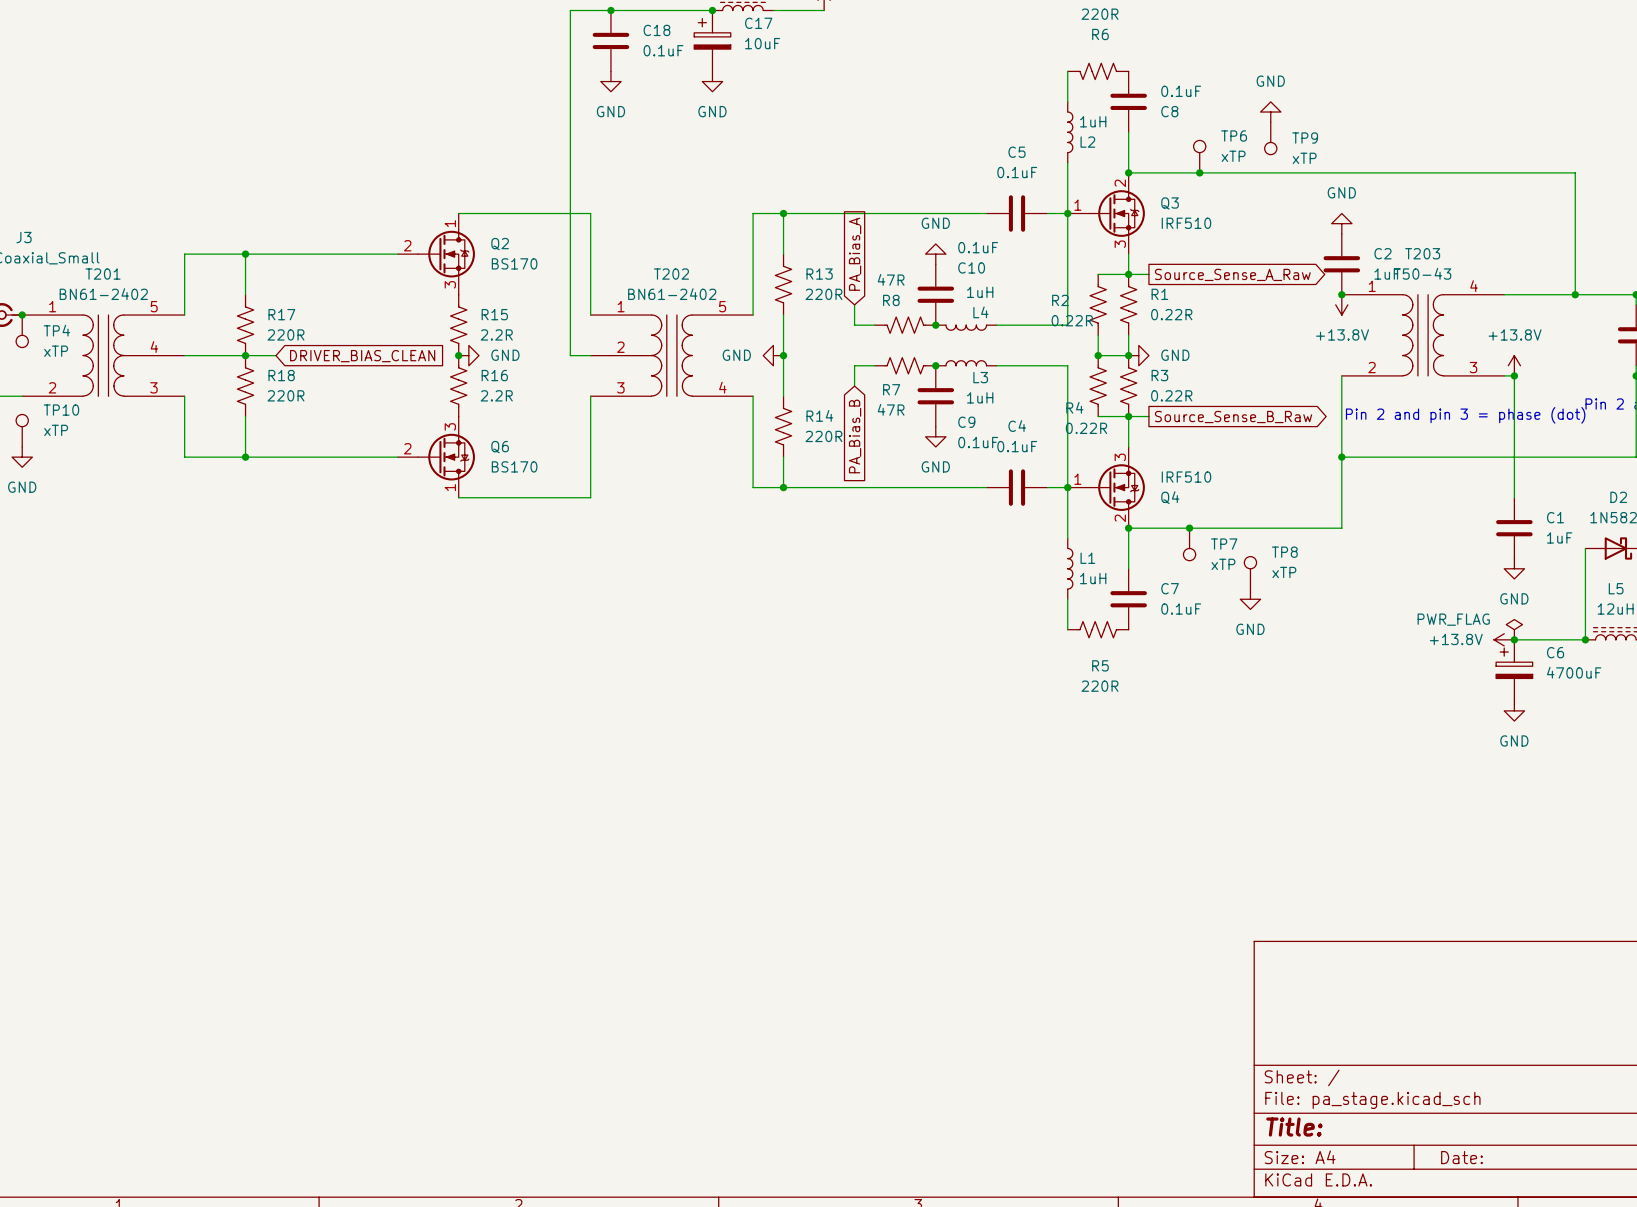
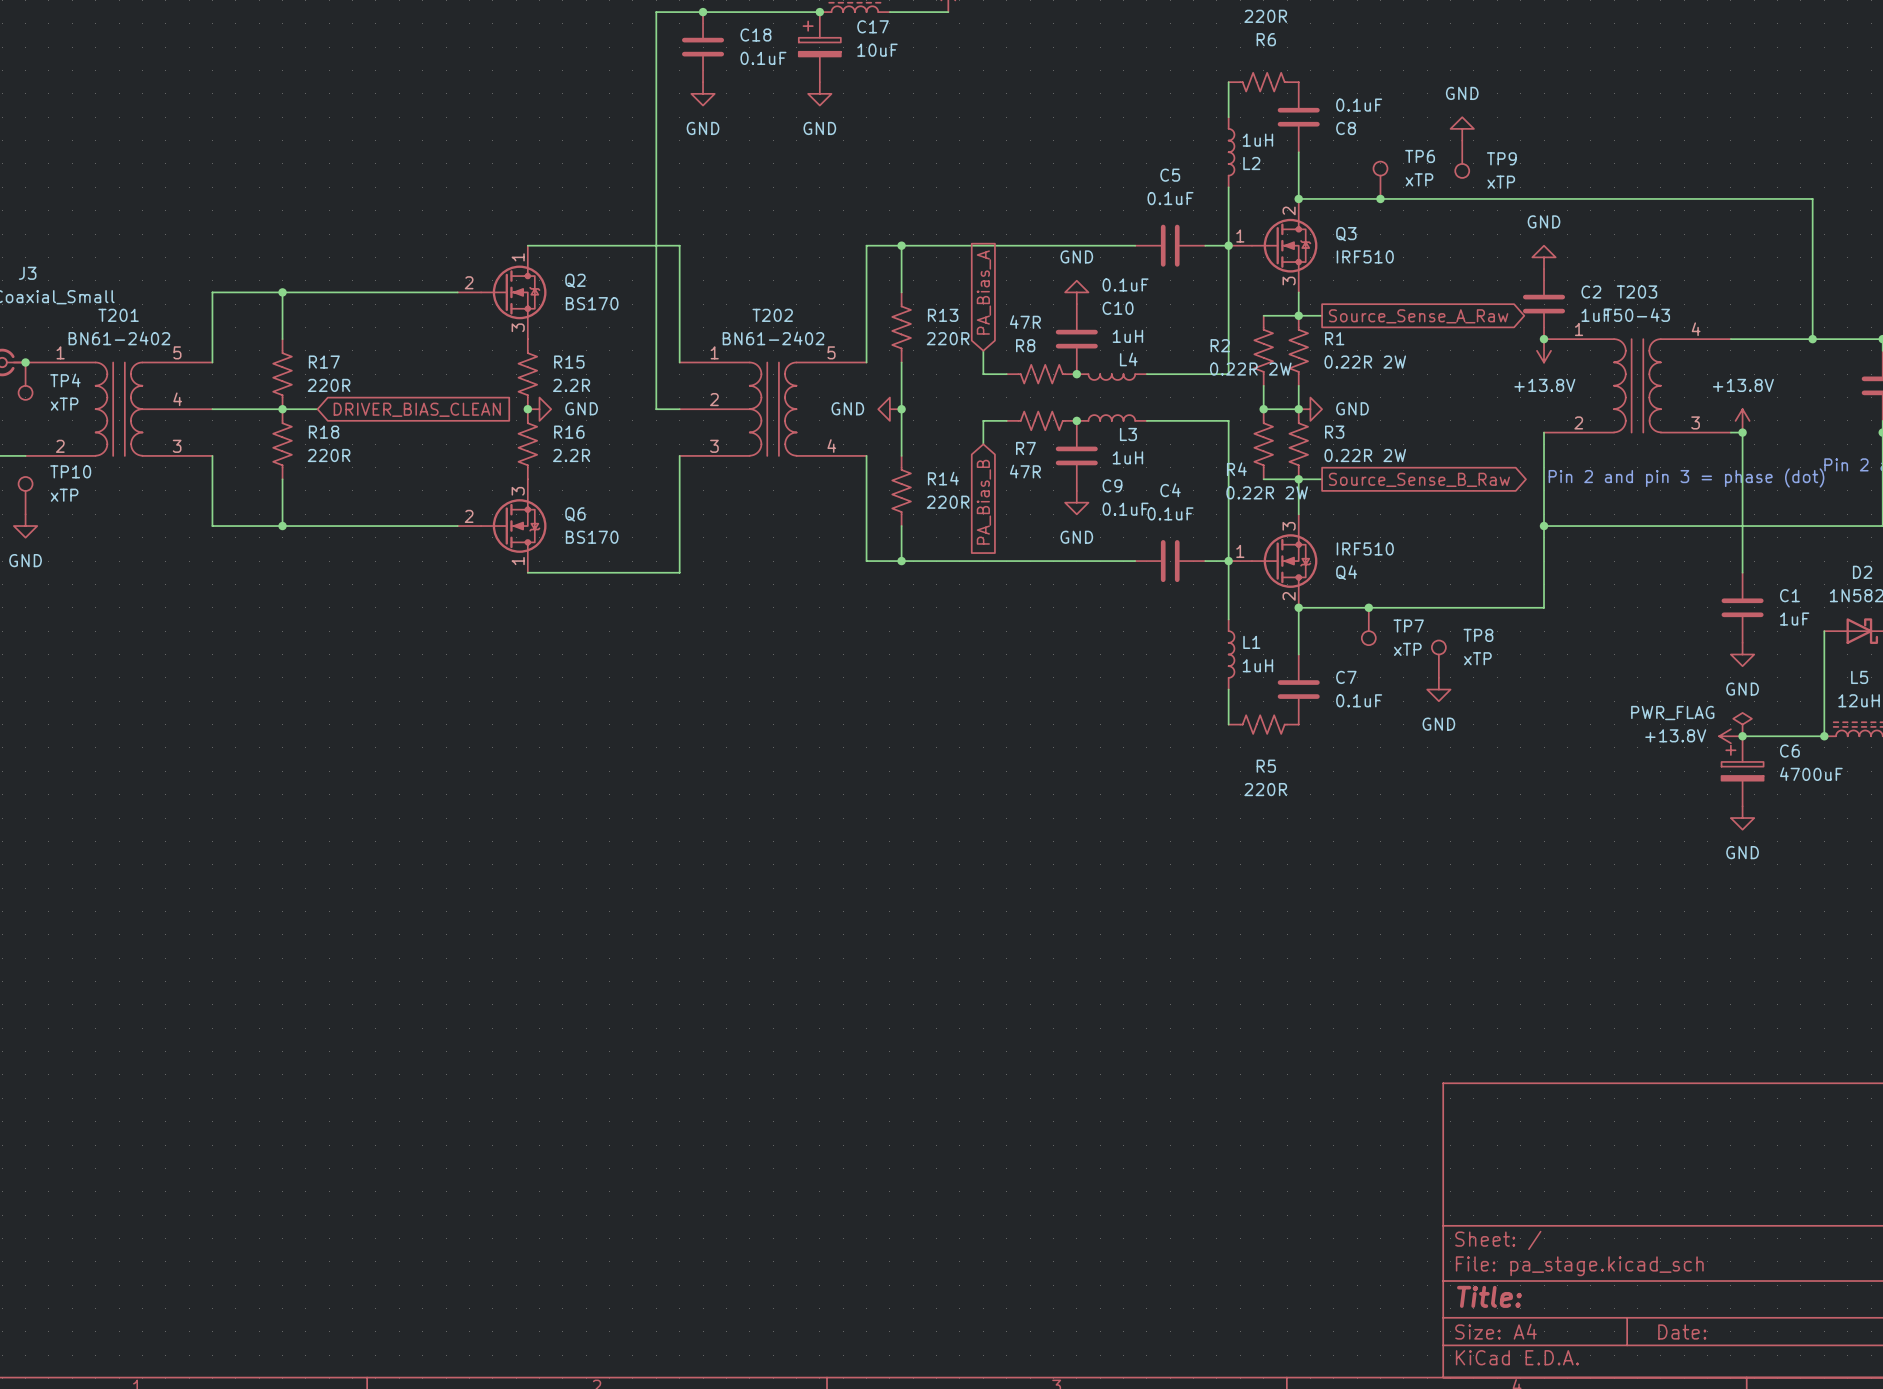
R1 value: 0.22R (1171, 314) -> 0.22R 2W (1365, 362)
R2 value: 0.22R (1072, 320) -> 0.22R 2W (1250, 369)
R3 value: 0.22R (1171, 395) -> 0.22R 2W (1365, 455)
R4 value: 0.22R (1086, 428) -> 0.22R 2W (1267, 492)

